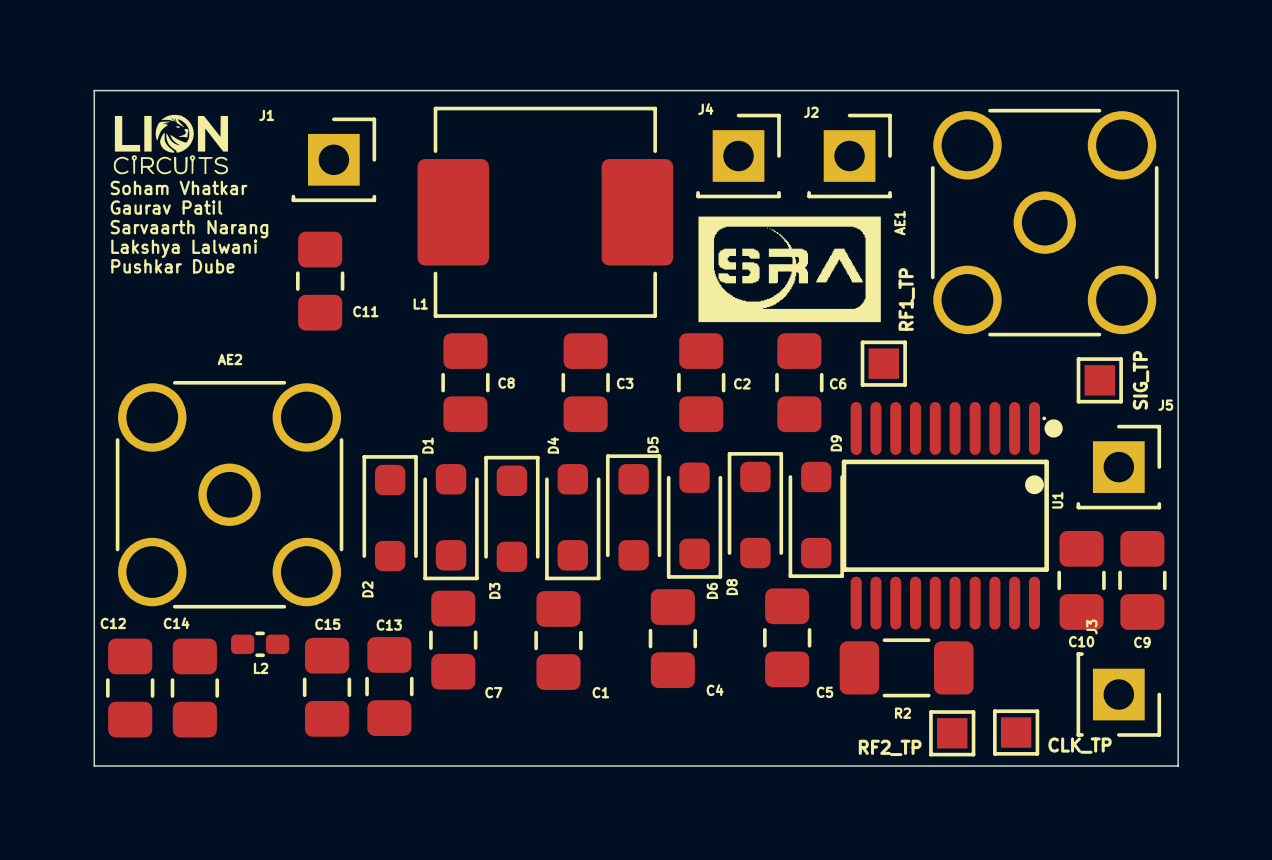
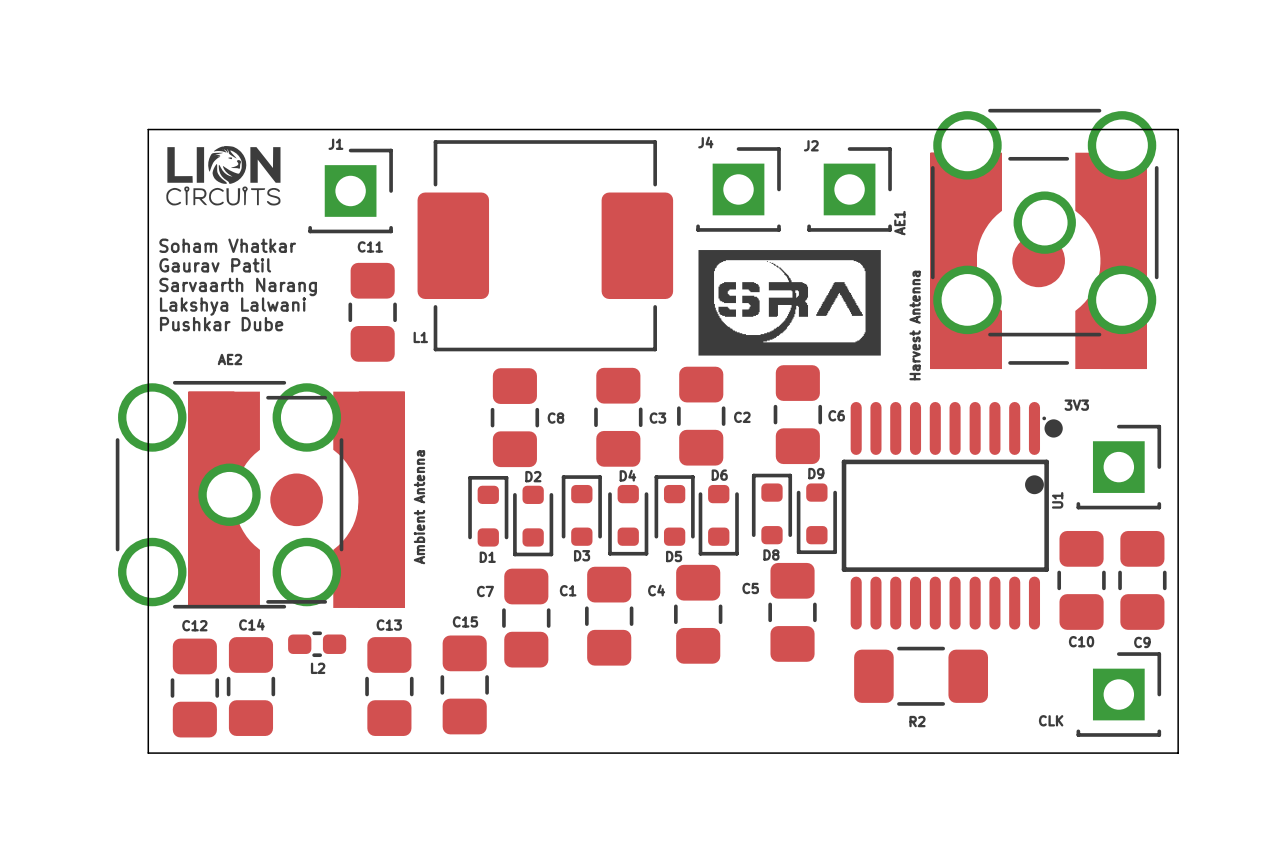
J1 name position: J1 (266, 115) -> J1 (335, 144)
board edge: (1178, 129) (1178, 90) (94, 90) (94, 766) (1178, 766) (1178, 753) -> (1178, 129) (148, 129) (148, 753) (1178, 753)
drawing position: (170, 144) -> (223, 175)
J4 position: (738, 156) -> (738, 189)
J2 position: (849, 156) -> (849, 189)
J1 position: (333, 159) -> (350, 190)
text position: Soham Vhatkar (179, 187) -> Soham Vhatkar (227, 245)
text position: Gaurav Patil (166, 207) -> Gaurav Patil (215, 265)
L1 position: (545, 212) -> (545, 245)
text position: Sarvaarth Narang (189, 229) -> Sarvaarth Narang (238, 286)
text position: Lakshya Lalwani (184, 248) -> Lakshya Lalwani (232, 306)
Harvest Antenna: none -> (1038, 260)
text position: Pushkar Dube (172, 266) -> Pushkar Dube (221, 324)
drawing position: (789, 269) -> (789, 302)
C11 position: (320, 281) -> (372, 312)
C11 name position: C11 (365, 311) -> C11 (370, 246)
RF1_TP: (883, 363) -> none
SIG_TP: (1099, 380) -> none
C8 position: (465, 382) -> (514, 417)
C3 position: (585, 382) -> (618, 417)
C2 position: (701, 382) -> (701, 416)
C6 position: (799, 382) -> (797, 414)
J5 name: J5 (1165, 405) -> 3V3 (1076, 405)
D9 name rotation: 0° (836, 443) -> 90° clockwise (816, 473)
D9 name position: D9 (836, 443) -> D9 (816, 473)
D5 name position: D5 (652, 444) -> D5 (674, 556)
D1 name position: D1 (427, 445) -> D1 (487, 557)
D8 footprint: [727, 452, 784, 569] -> [751, 473, 793, 545]
D5 footprint: [605, 454, 662, 571] -> [654, 475, 695, 546]
D1 footprint: [362, 455, 418, 572] -> [468, 475, 509, 547]
D3 footprint: [484, 455, 540, 573] -> [561, 475, 602, 546]
D9 footprint: [788, 461, 844, 578] -> [796, 483, 837, 555]
D6 footprint: [666, 462, 723, 579] -> [698, 484, 739, 556]
D2 footprint: [423, 464, 479, 581] -> [513, 485, 554, 557]
D4 footprint: [545, 464, 601, 581] -> [608, 484, 649, 556]
Ambient Antenna: none -> (296, 499)
D2 name position: D2 (367, 589) -> D2 (533, 476)
D6 name position: D6 (712, 590) -> D6 (719, 475)
C14 name: C14 (176, 623) -> C12 (194, 625)
C5 position: (787, 637) -> (792, 612)
C4 position: (672, 638) -> (698, 614)
C7 position: (453, 640) -> (526, 618)
C1 position: (558, 640) -> (609, 616)
L2 position: (260, 644) -> (317, 644)
R2 position: (906, 667) -> (921, 676)
C14: none -> (250, 686)
C15 position: (327, 687) -> (464, 684)
C12: (130, 688) -> none
C4 name position: C4 (715, 690) -> C4 (656, 590)
C7 name position: C7 (493, 692) -> C7 (485, 591)
C1 name position: C1 (600, 692) -> C1 (568, 590)
C5 name position: C5 (824, 692) -> C5 (750, 588)
J3: (1118, 694) -> none
CLK: none -> (1118, 694)
CLK_TP: (1016, 732) -> none
RF2_TP: (952, 733) -> none

